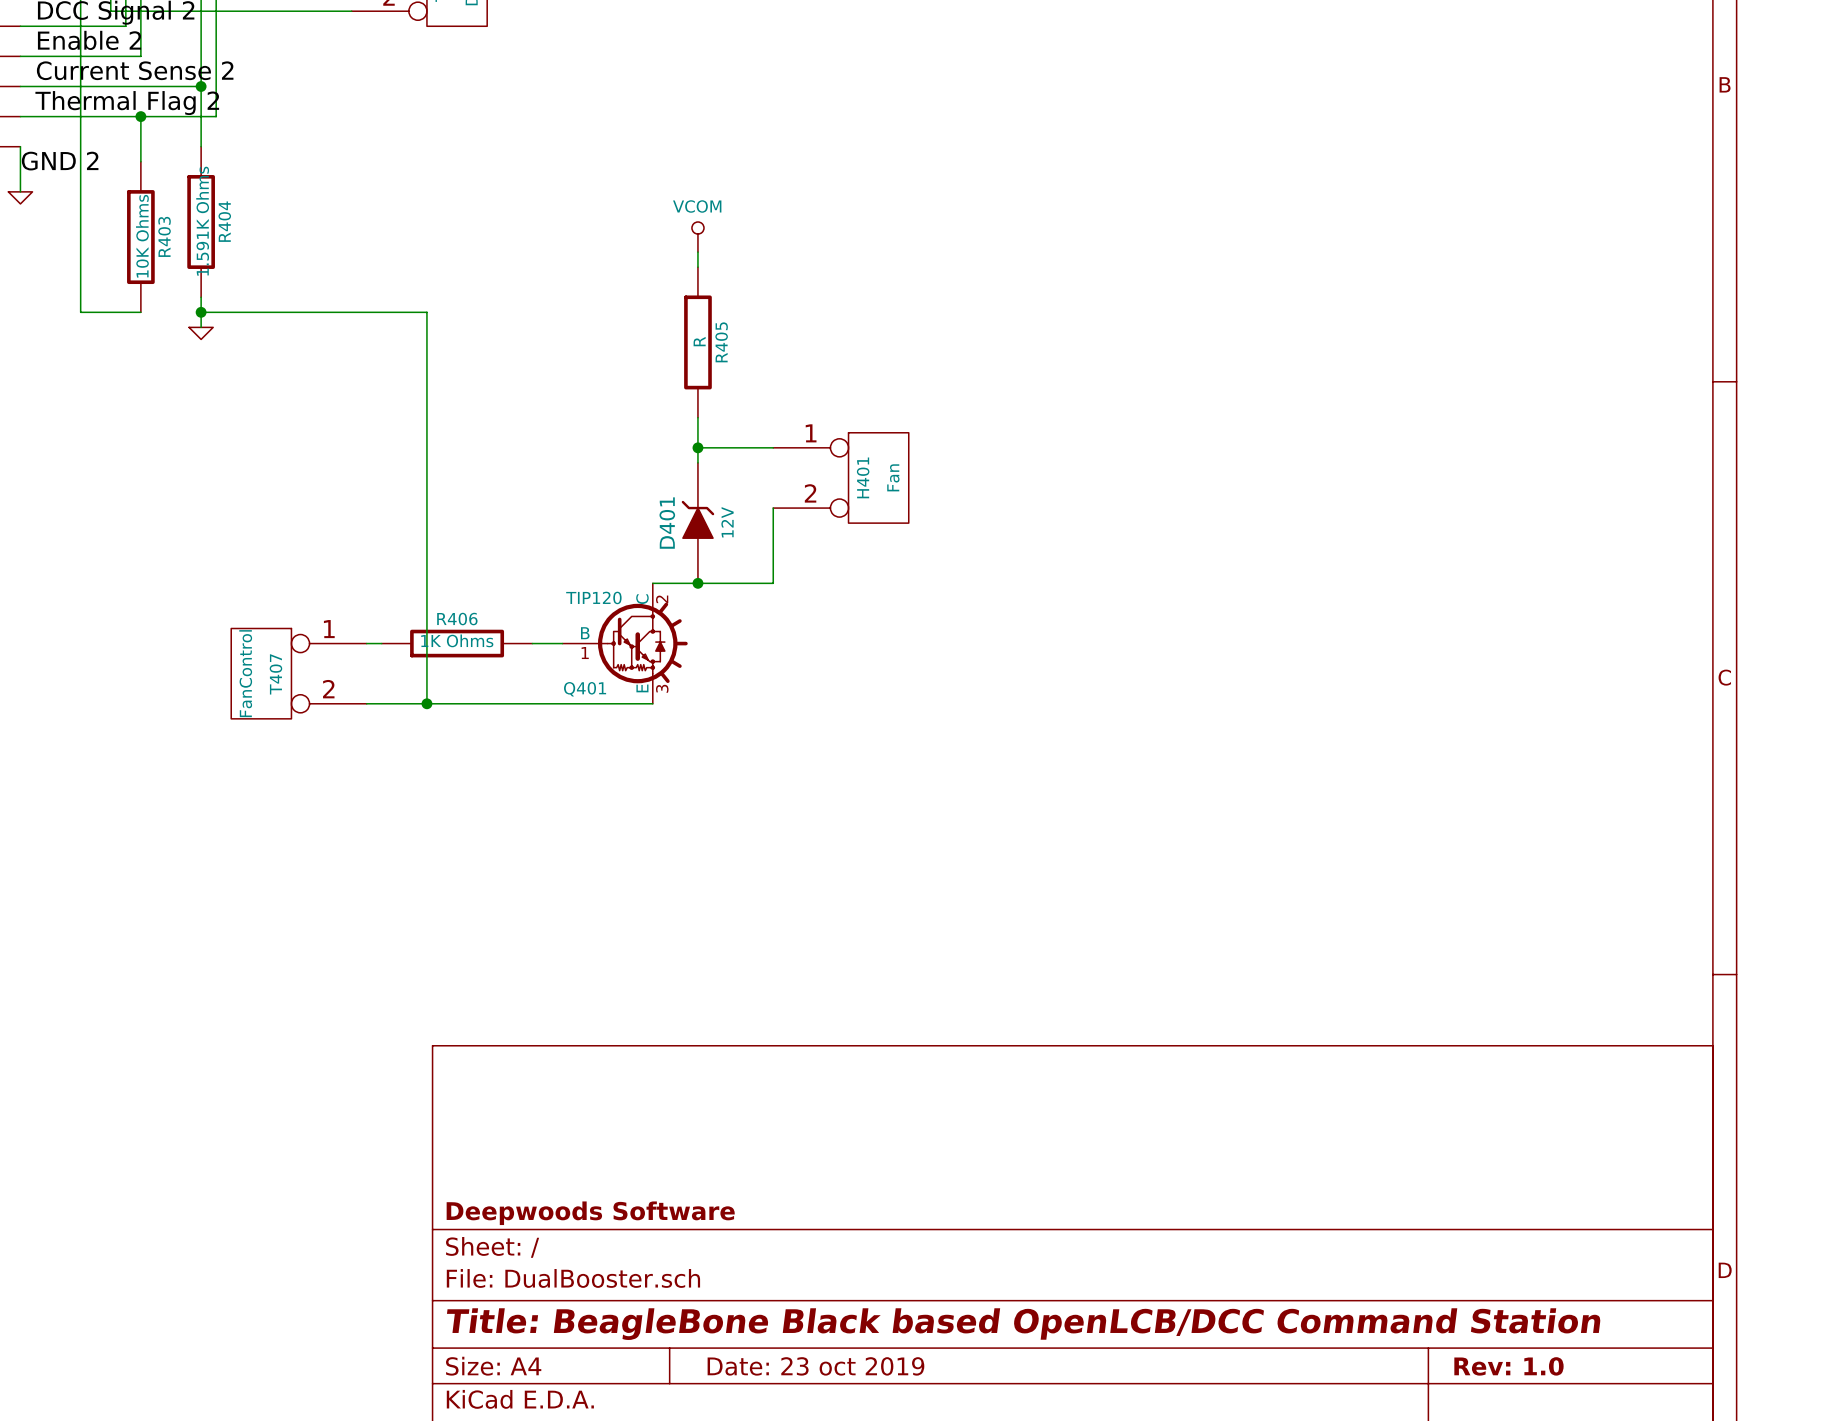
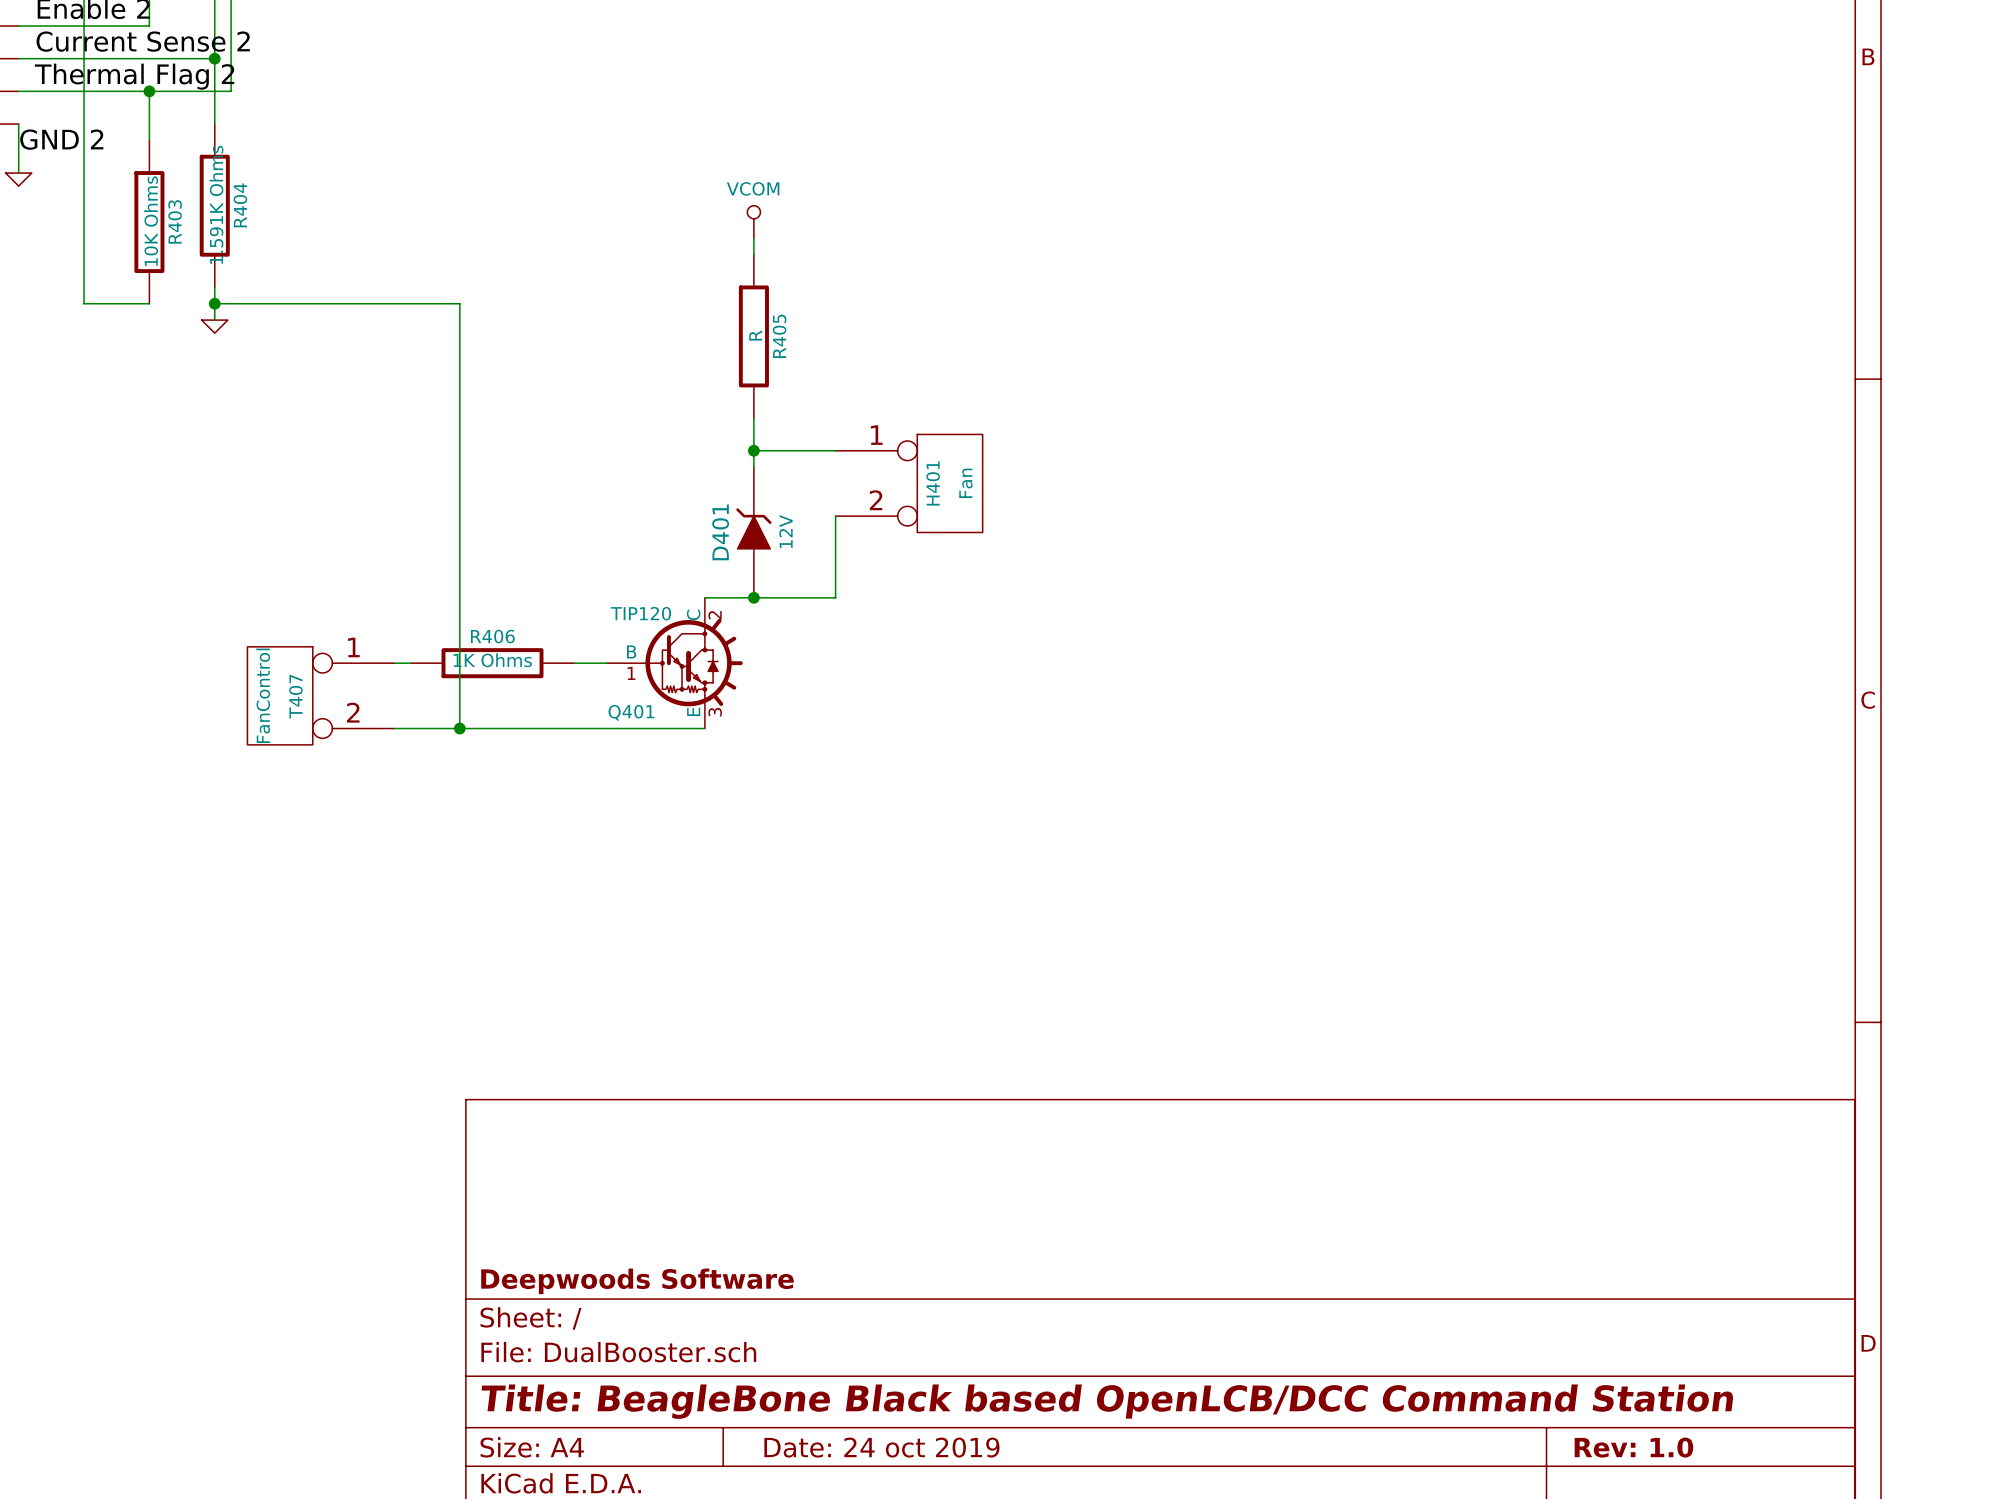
title block: Date: 23 oct 2019 (815, 1366) -> Date: 24 oct 2019 (881, 1447)

